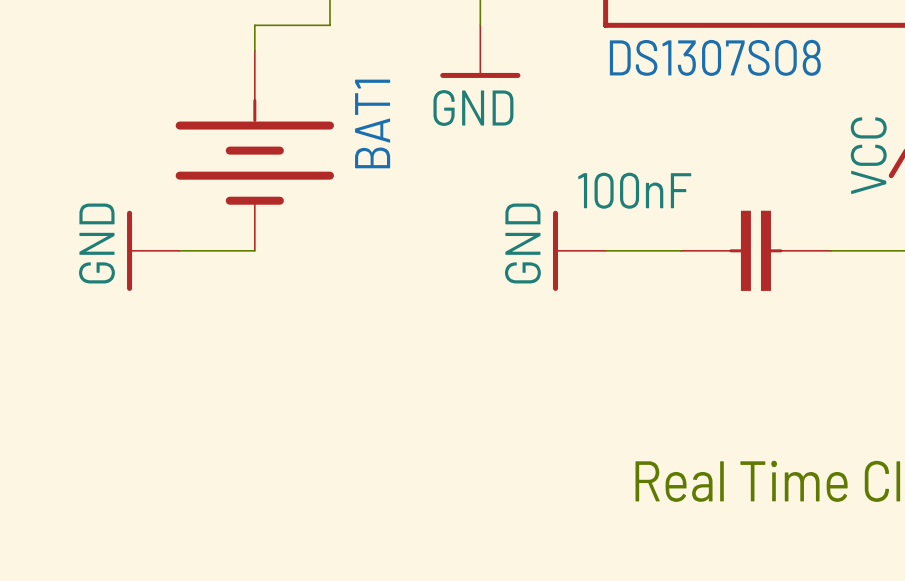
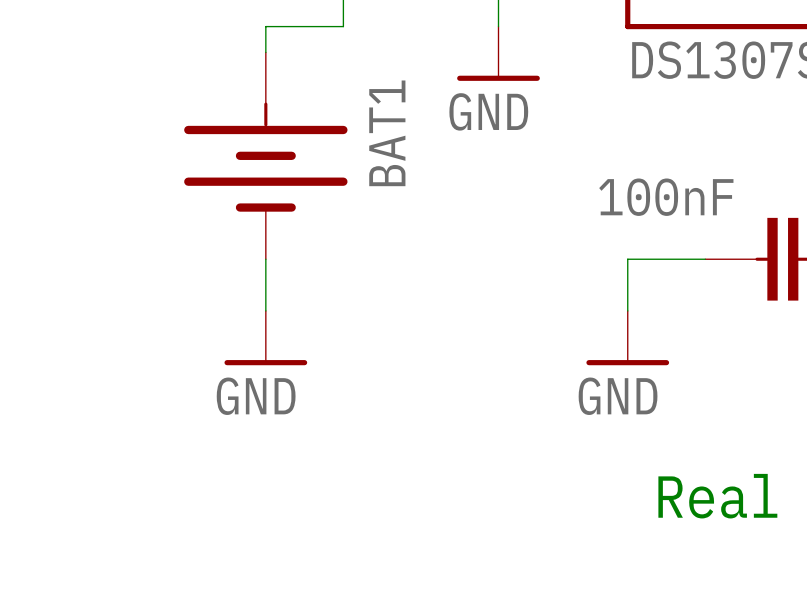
power symbol rotation: 0° (129, 250) -> 90° counterclockwise (265, 362)
power symbol position: GND (153, 250) -> GND (265, 338)
wire: (179, 250) (254, 250) -> (265, 310) (265, 259)
power symbol rotation: 0° (555, 250) -> 90° counterclockwise (627, 362)
power symbol position: GND (579, 250) -> GND (627, 338)
wire: none -> (627, 259) (627, 310)

